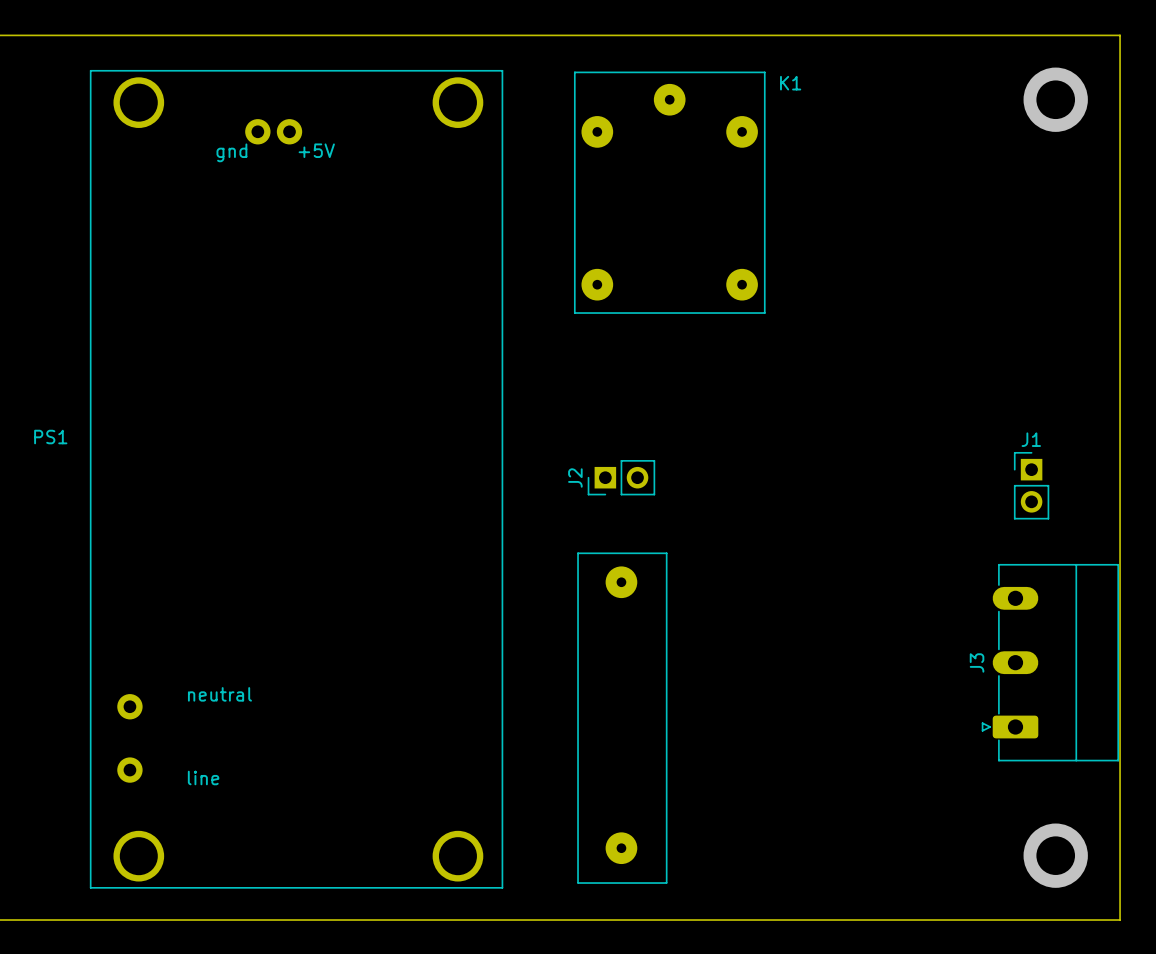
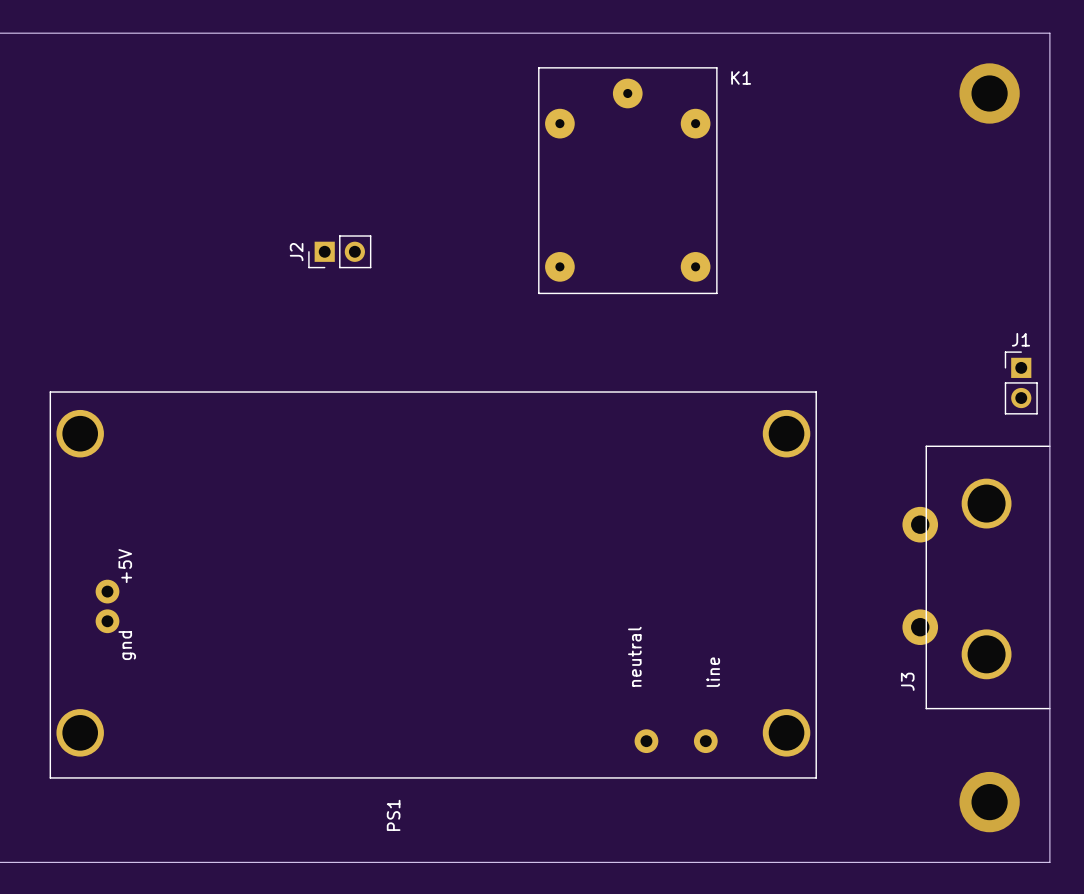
J2 position: (621, 477) -> (339, 251)
PS1 rotation: 0° (296, 479) -> 90° counterclockwise (433, 584)
J1 position: (1031, 485) -> (1021, 382)
J3 footprint: [981, 564, 1119, 762] -> [902, 445, 1051, 710]
J3 name position: J3 (977, 662) -> J3 (907, 681)
part: (622, 718) -> none

